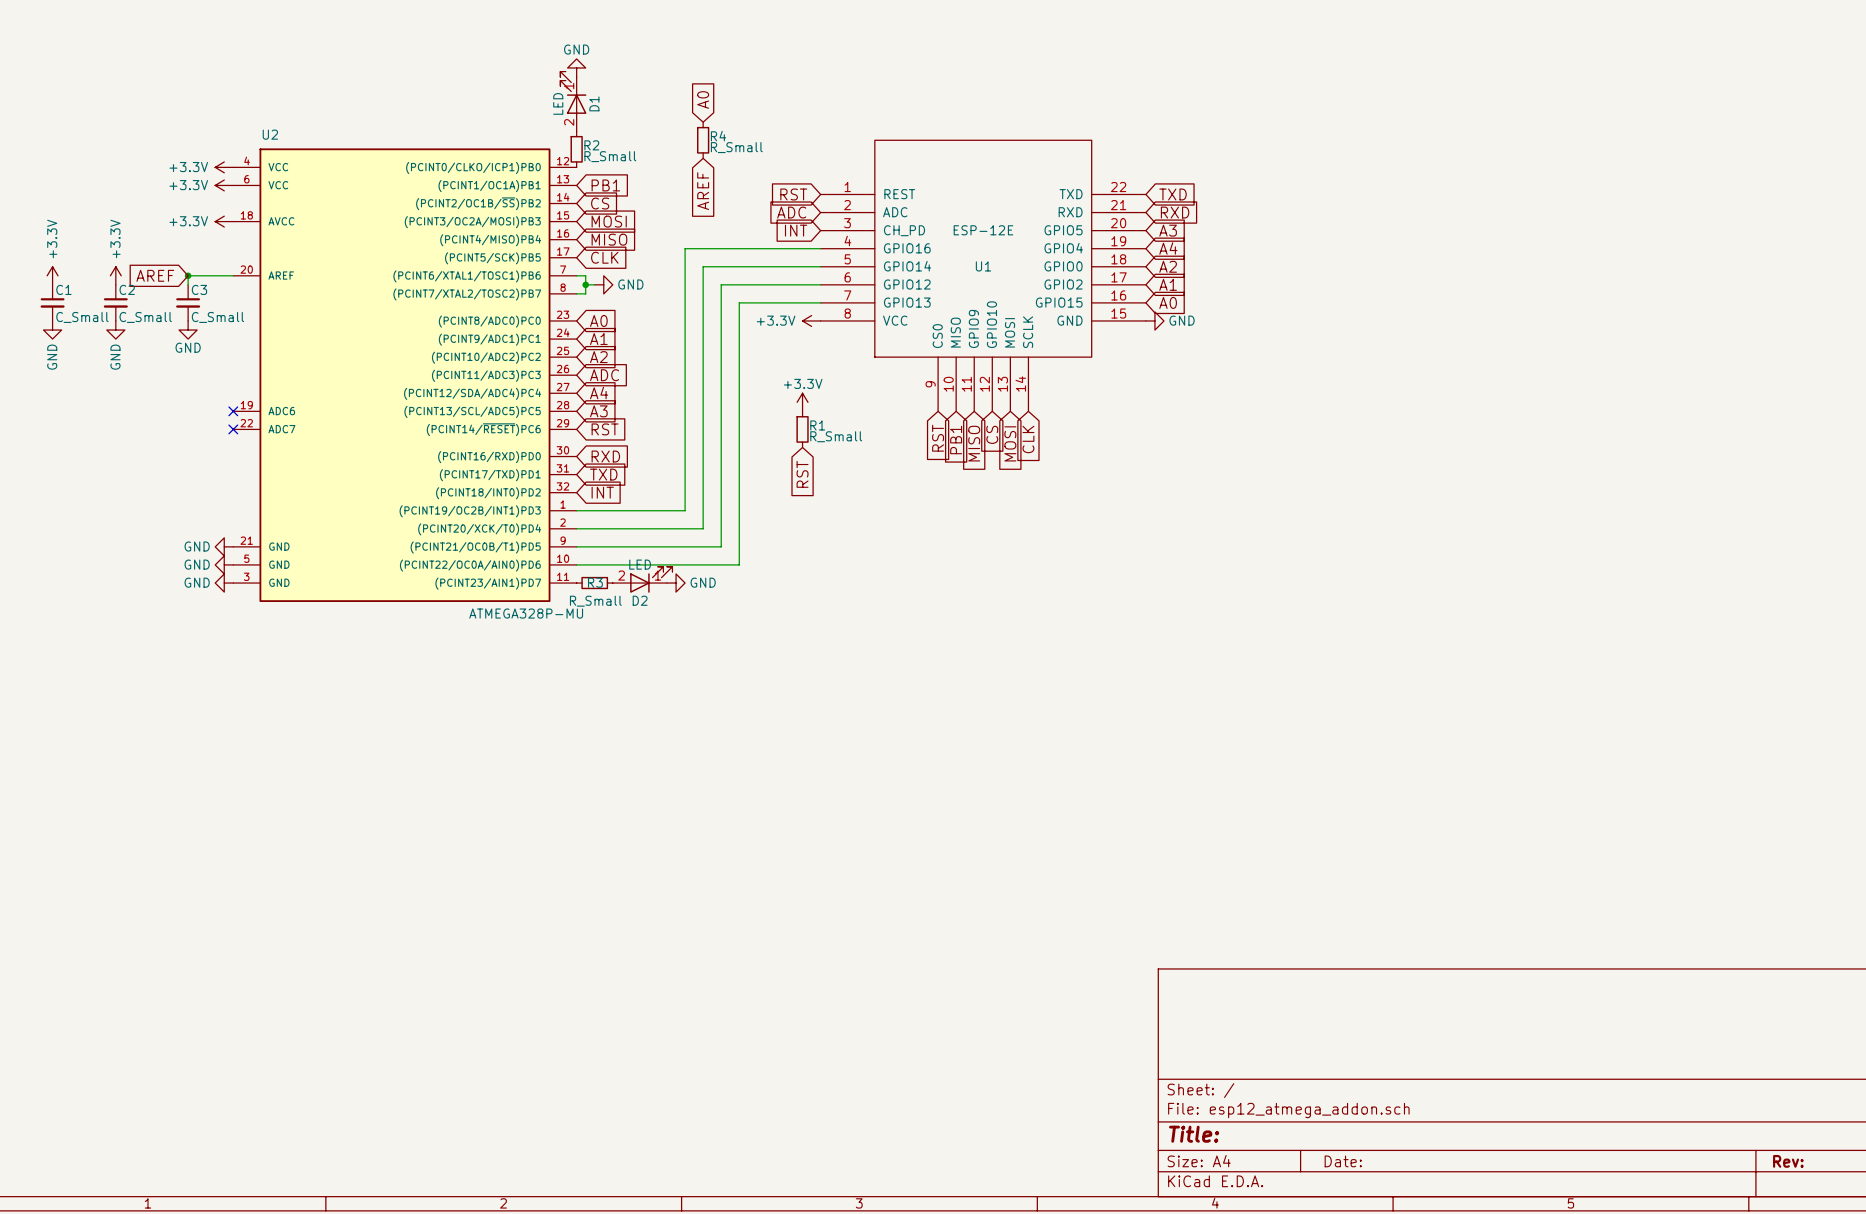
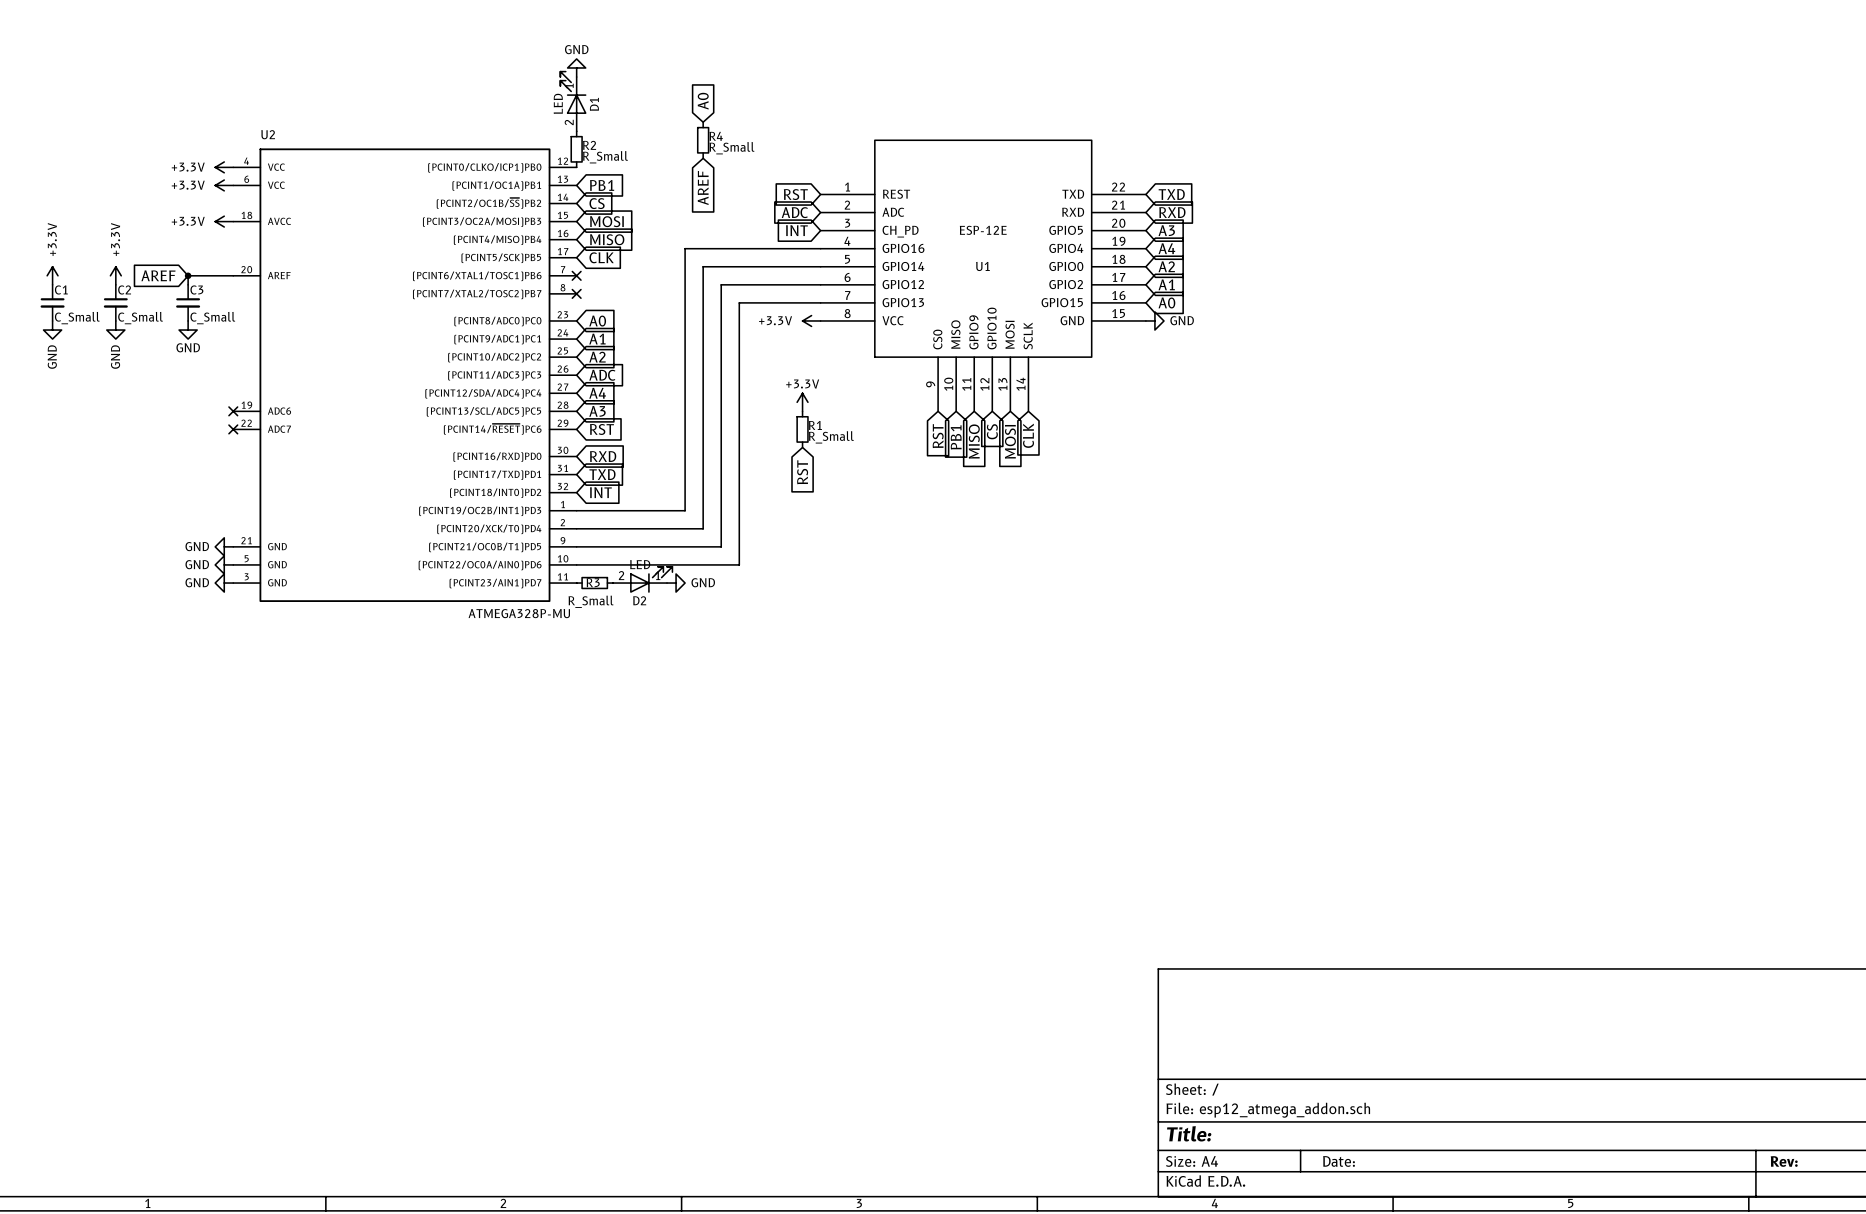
wire: (576, 275) (585, 275) (585, 293) (576, 293) -> none
no-connect mark: none -> (576, 275)
wire: (585, 284) (594, 284) -> none
junction: (585, 284) -> none
power symbol: GND (603, 284) -> none
no-connect mark: none -> (576, 293)

